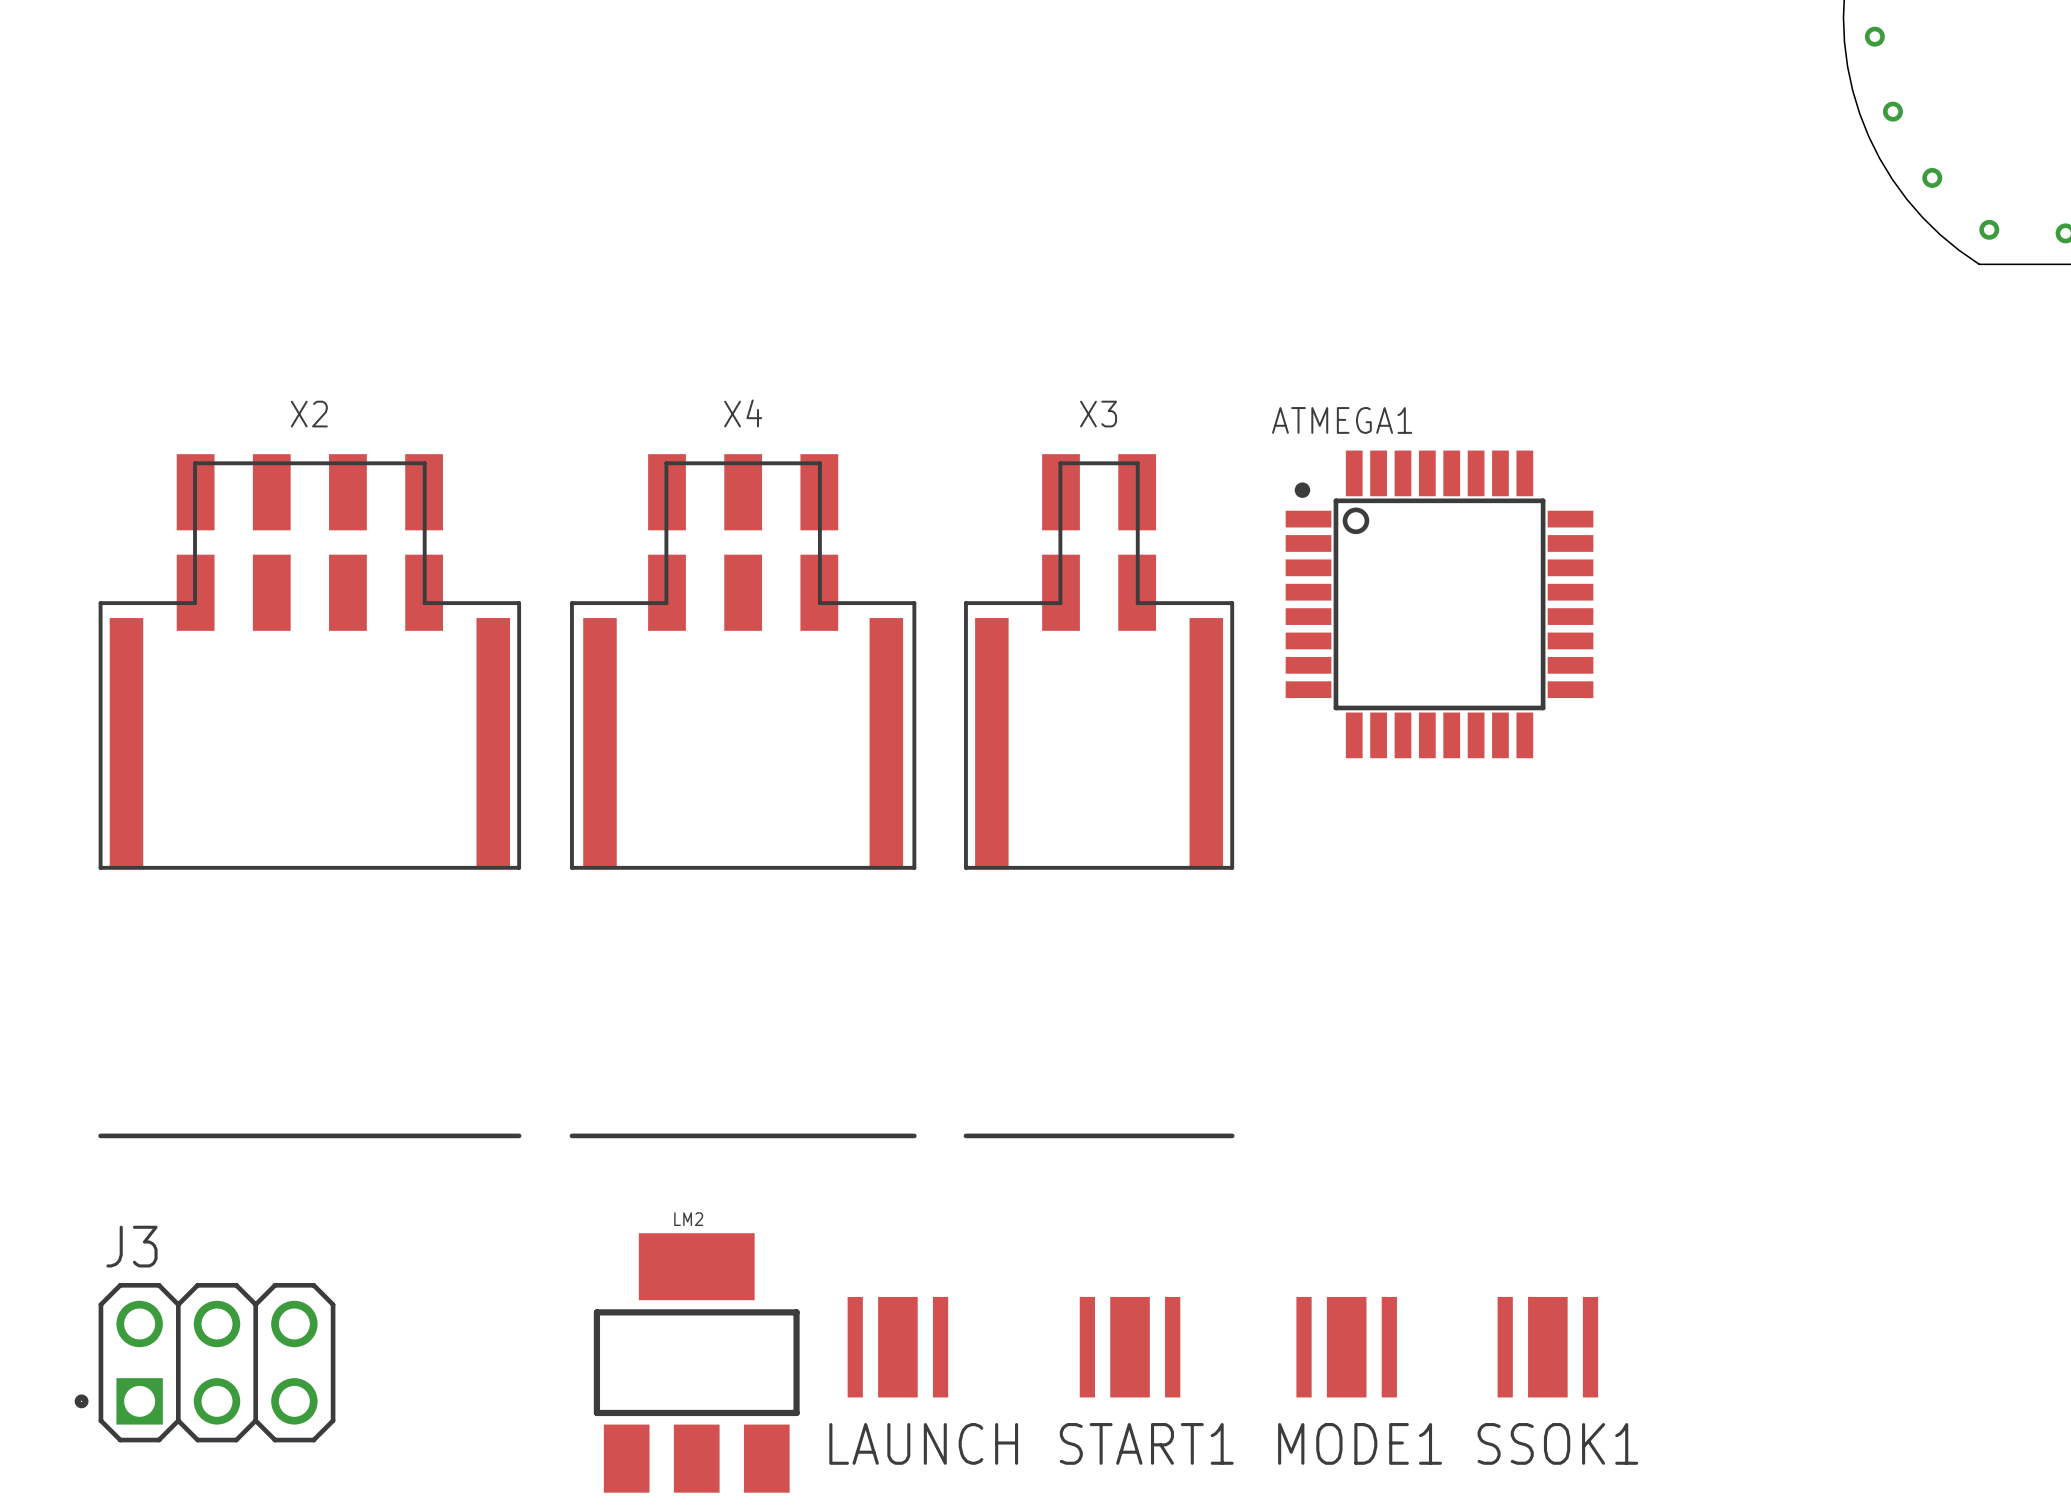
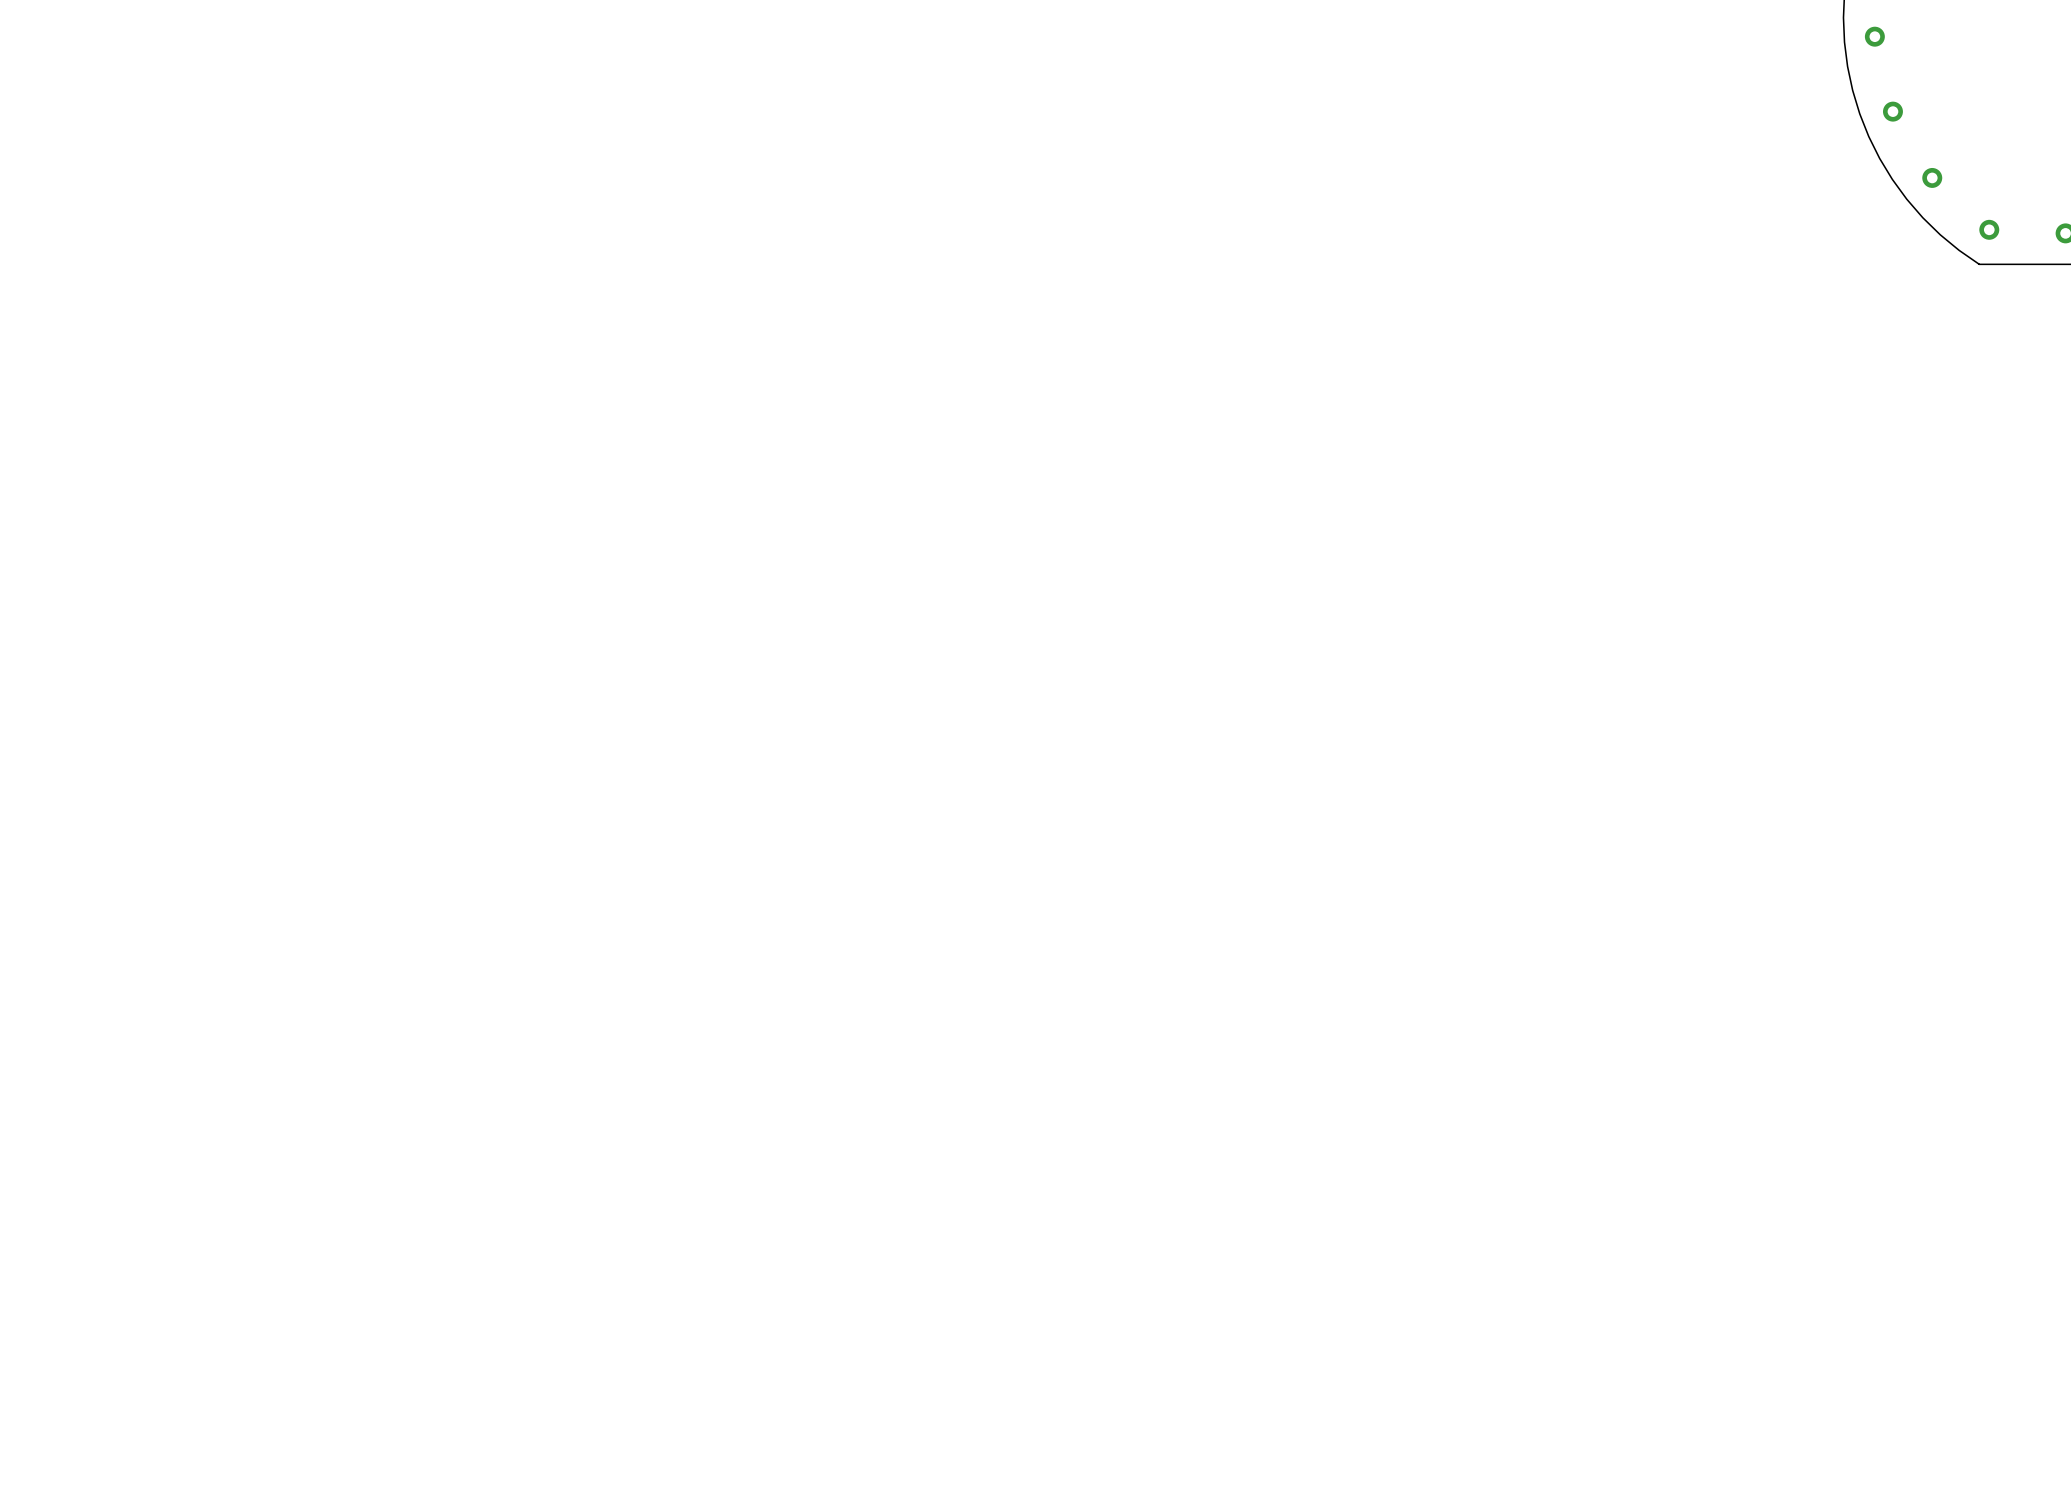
ATMEGA1: (1439, 604) -> none
X2: (309, 796) -> none
X4: (743, 796) -> none
X3: (1099, 796) -> none
LAUNCH: (897, 1347) -> none
START1: (1130, 1347) -> none
MODE1: (1346, 1347) -> none
SSOK1: (1547, 1347) -> none
J3: (205, 1362) -> none
LM2: (696, 1362) -> none

